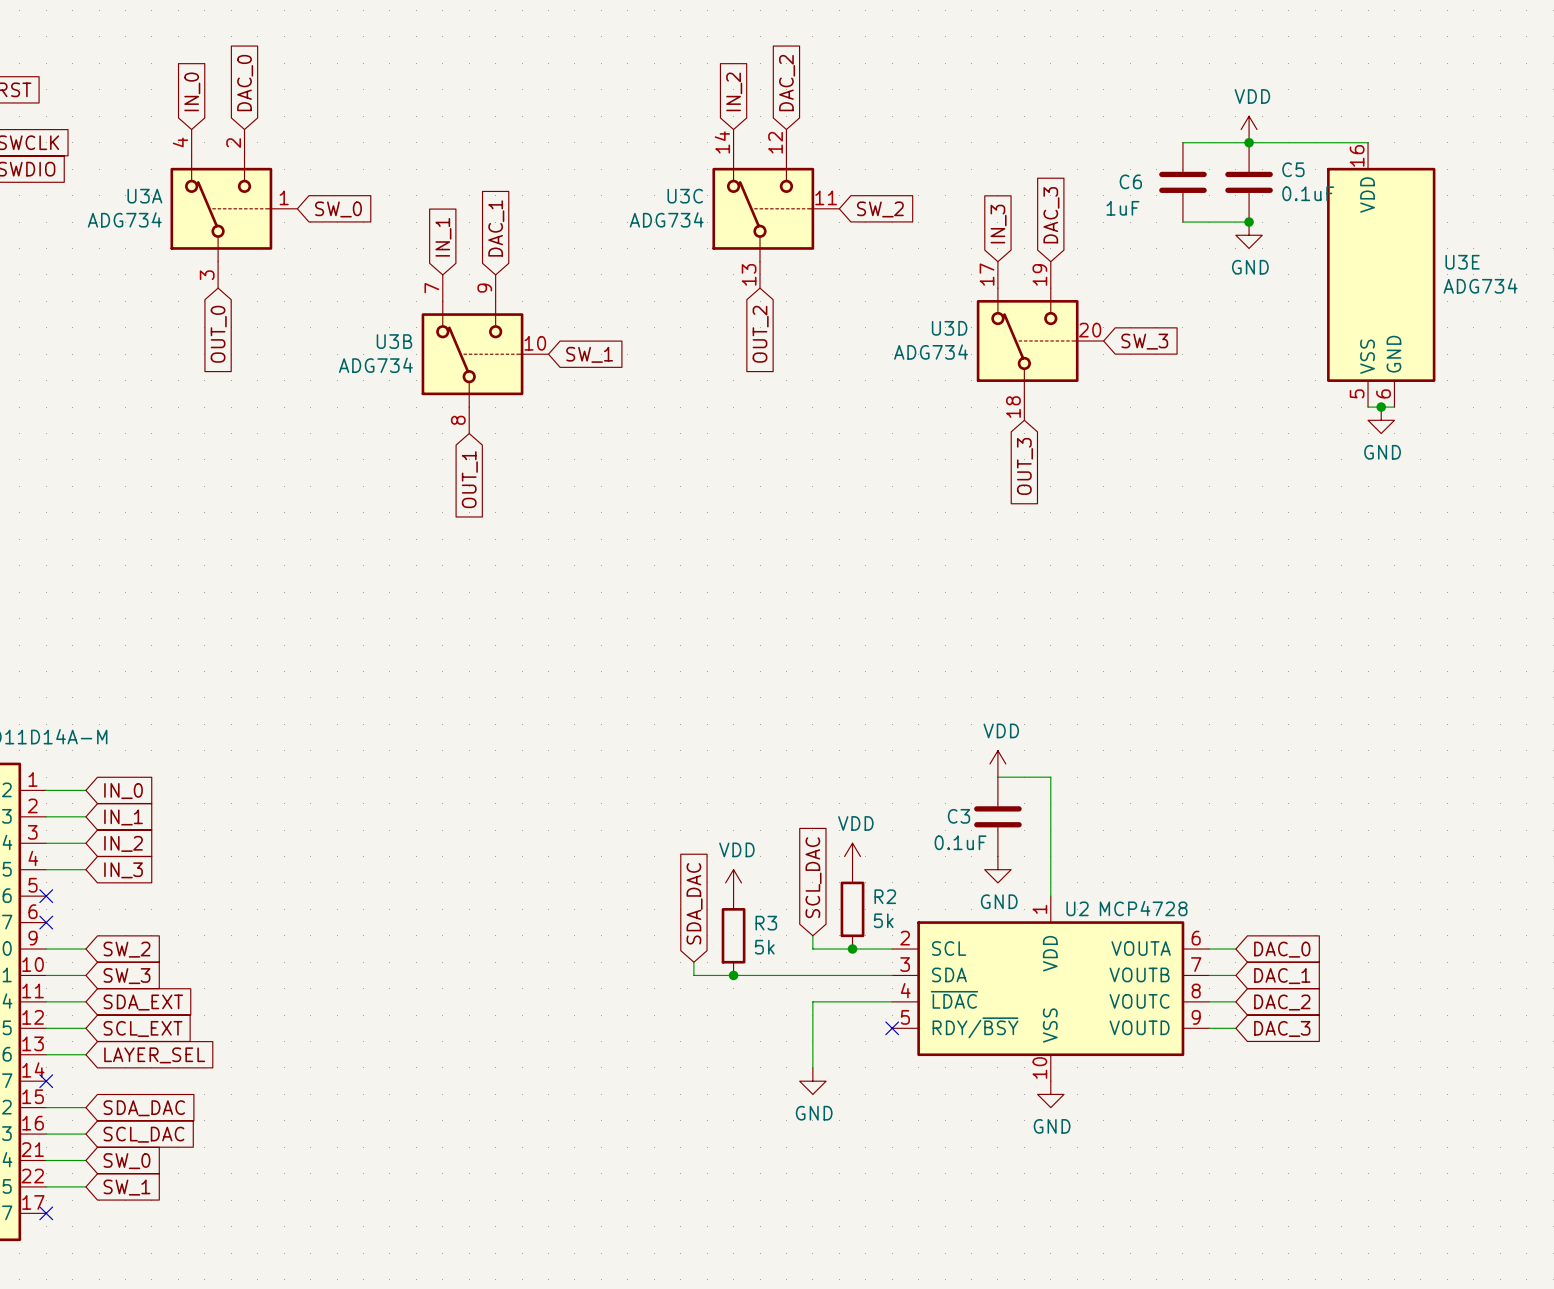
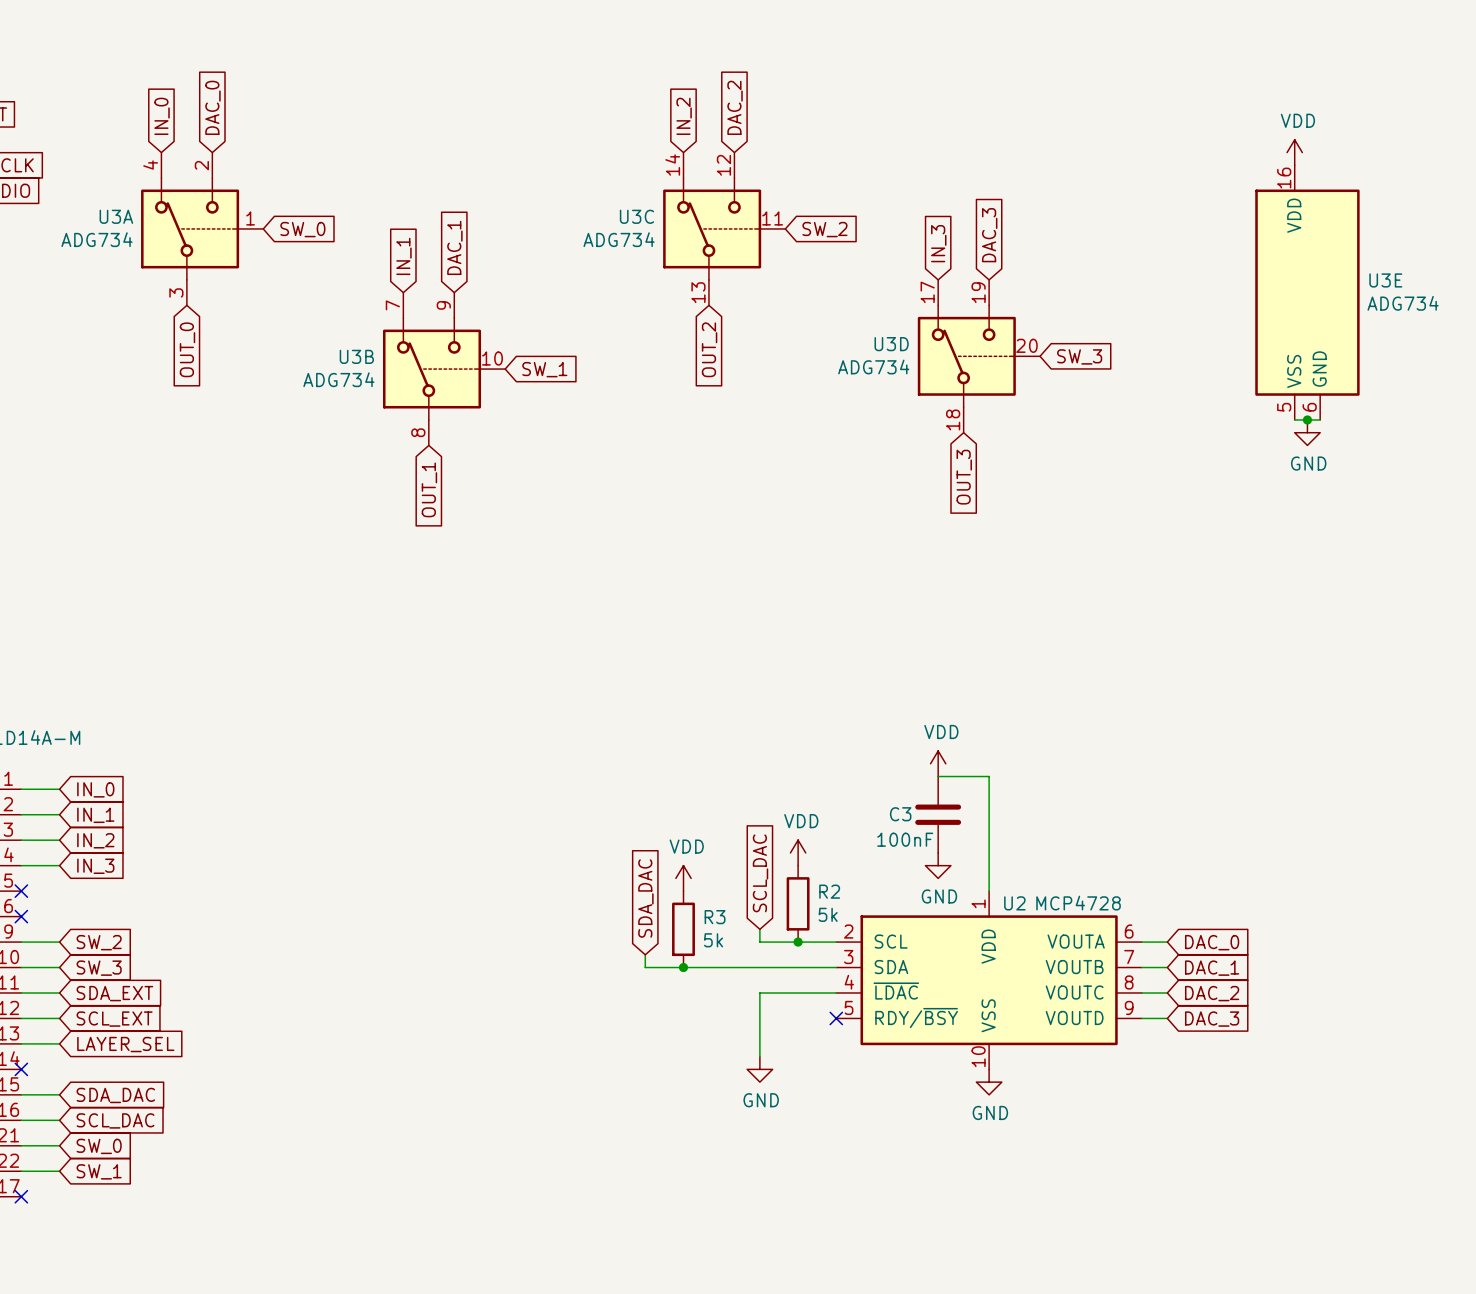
power symbol position: VDD (1249, 129) -> VDD (1294, 152)
wire: (1182, 142) (1368, 142) -> none
junction: (1249, 142) -> none
C6: 1uF (1182, 182) -> none
C5: 0.1uF (1249, 182) -> none
wire: (1182, 222) (1249, 222) -> none
junction: (1249, 222) -> none
power symbol: GND (1249, 235) -> none
C3 value: 0.1uF (960, 842) -> 100nF (905, 839)

